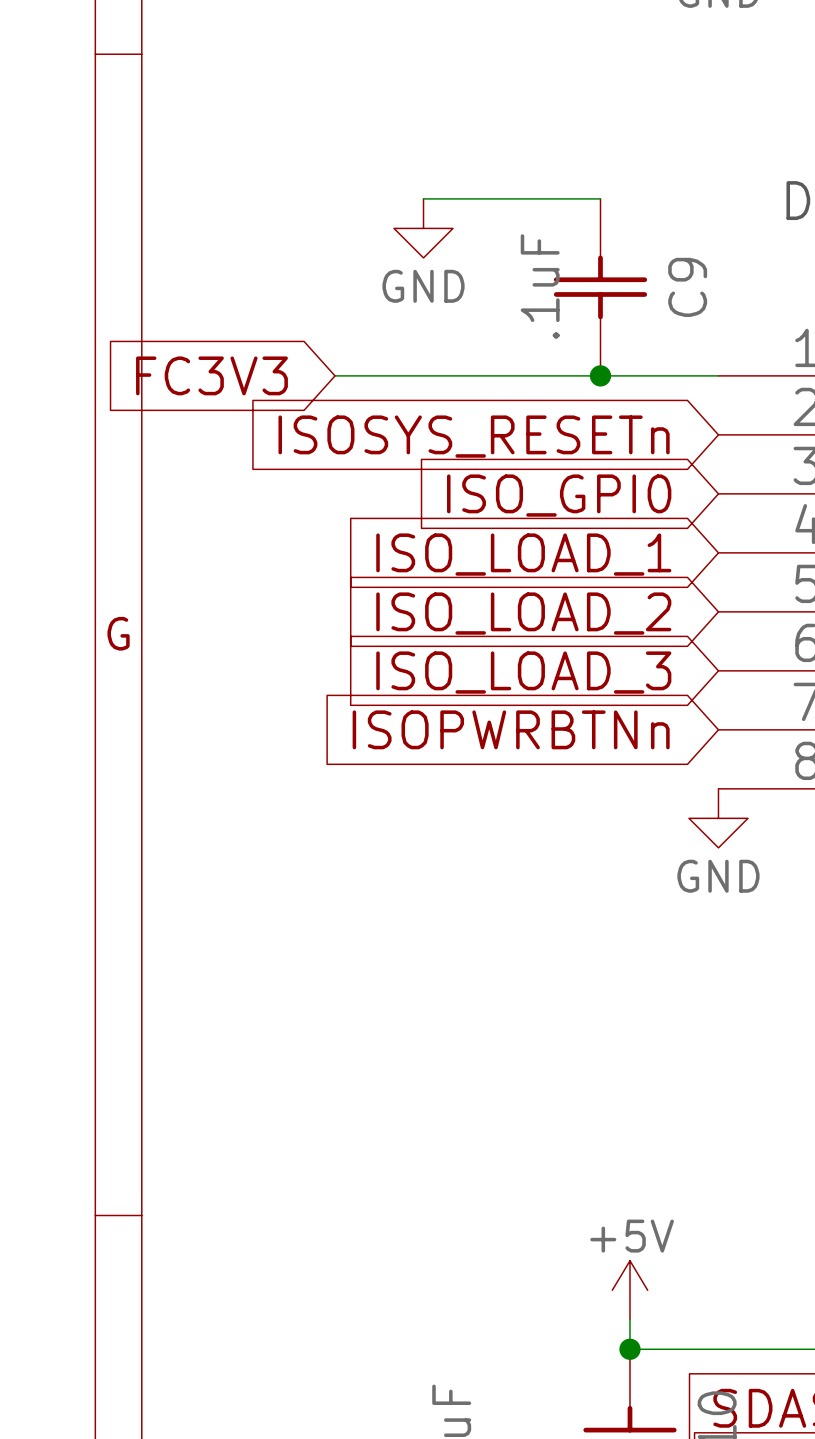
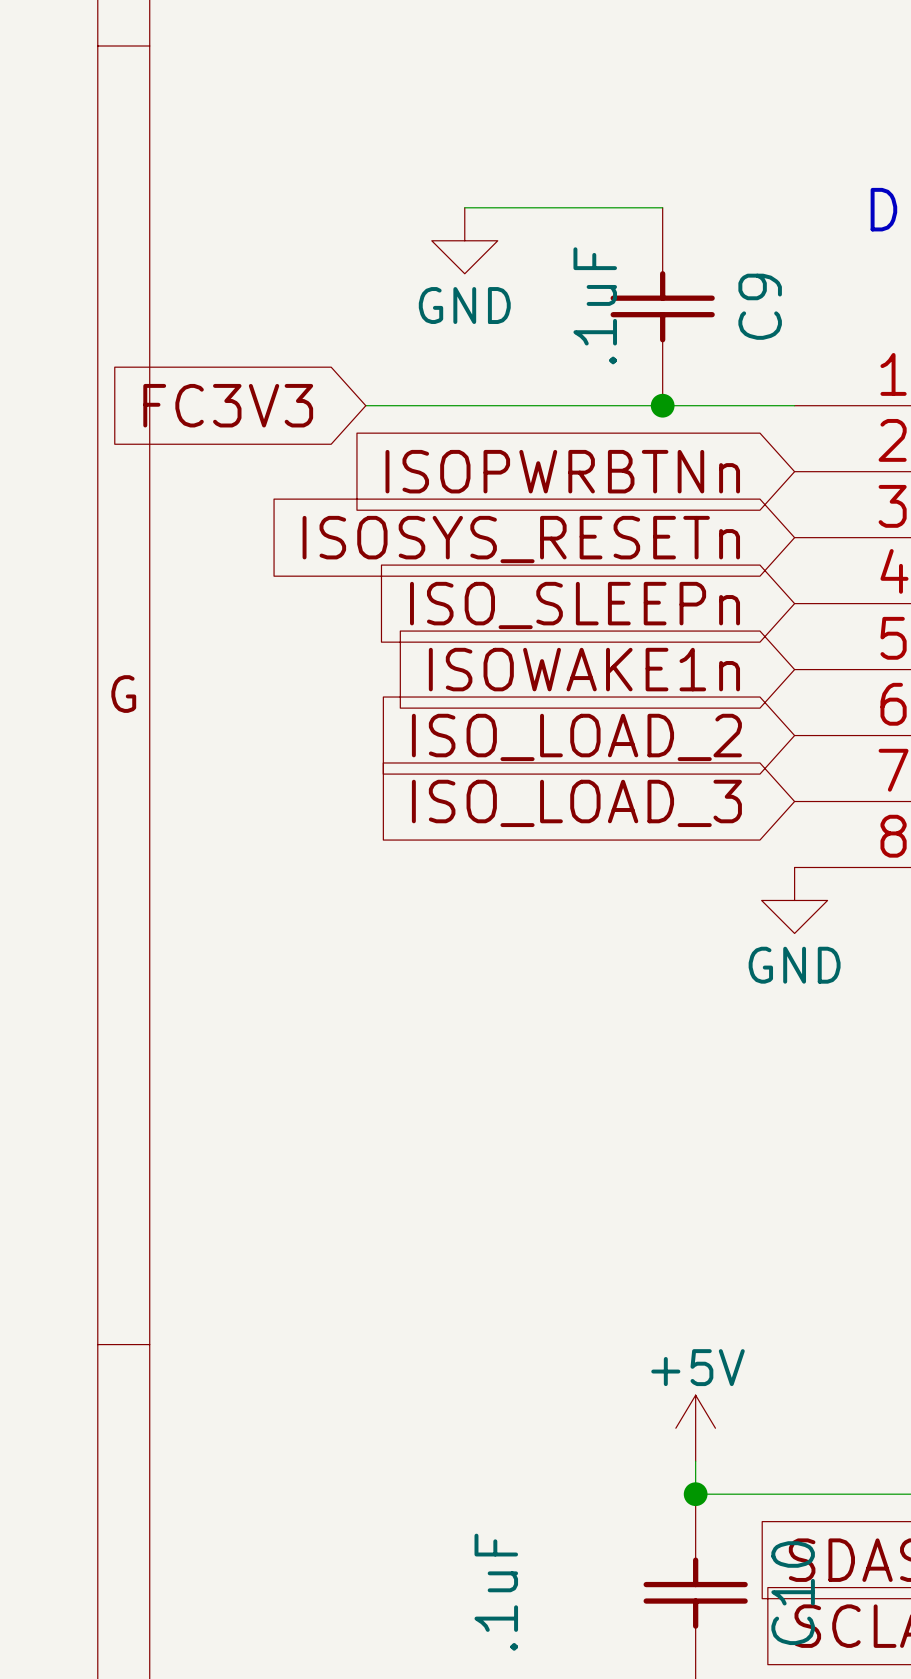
global label: ISOSYS_RESETn (474, 436) -> ISOPWRBTNn (562, 471)
global label: ISO_GPI0 (559, 495) -> ISOSYS_RESETn (521, 539)
global label: ISO_LOAD_1 (523, 554) -> ISO_SLEEPn (575, 605)
global label: ISO_LOAD_2 (523, 613) -> ISOWAKE1n (584, 669)
global label: ISO_LOAD_3 (523, 672) -> ISO_LOAD_2 (576, 737)
global label: ISOPWRBTNn (511, 729) -> ISO_LOAD_3 (576, 803)

